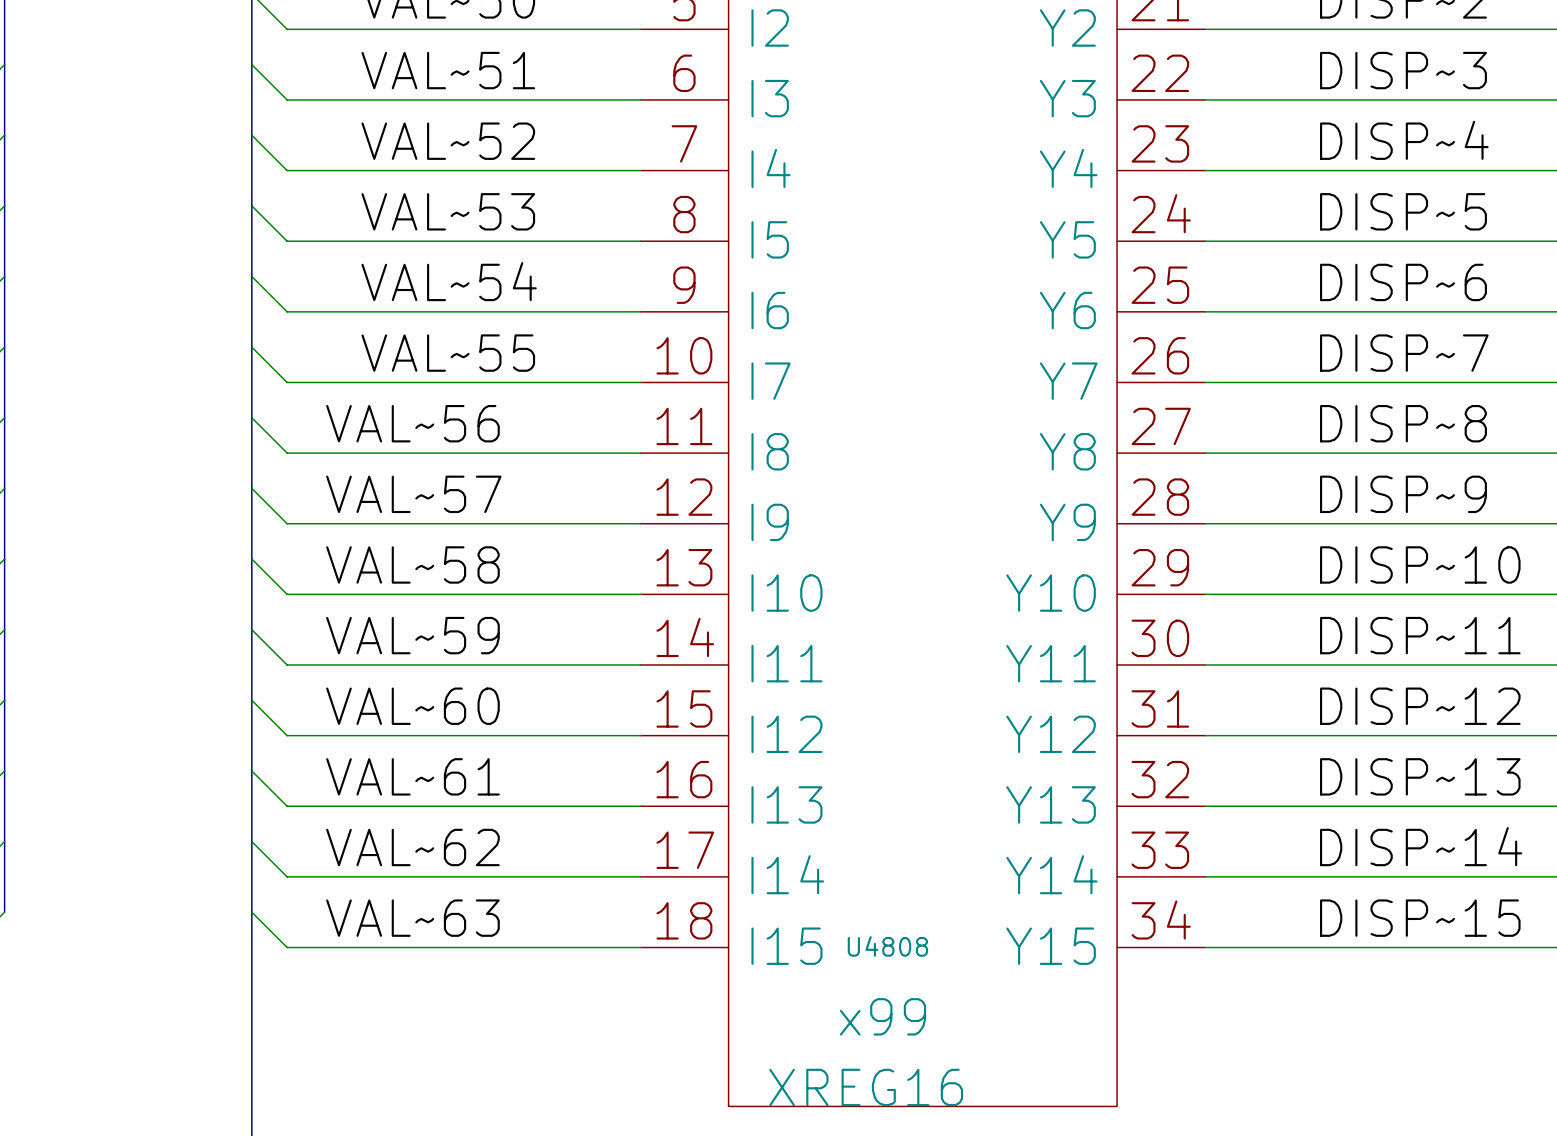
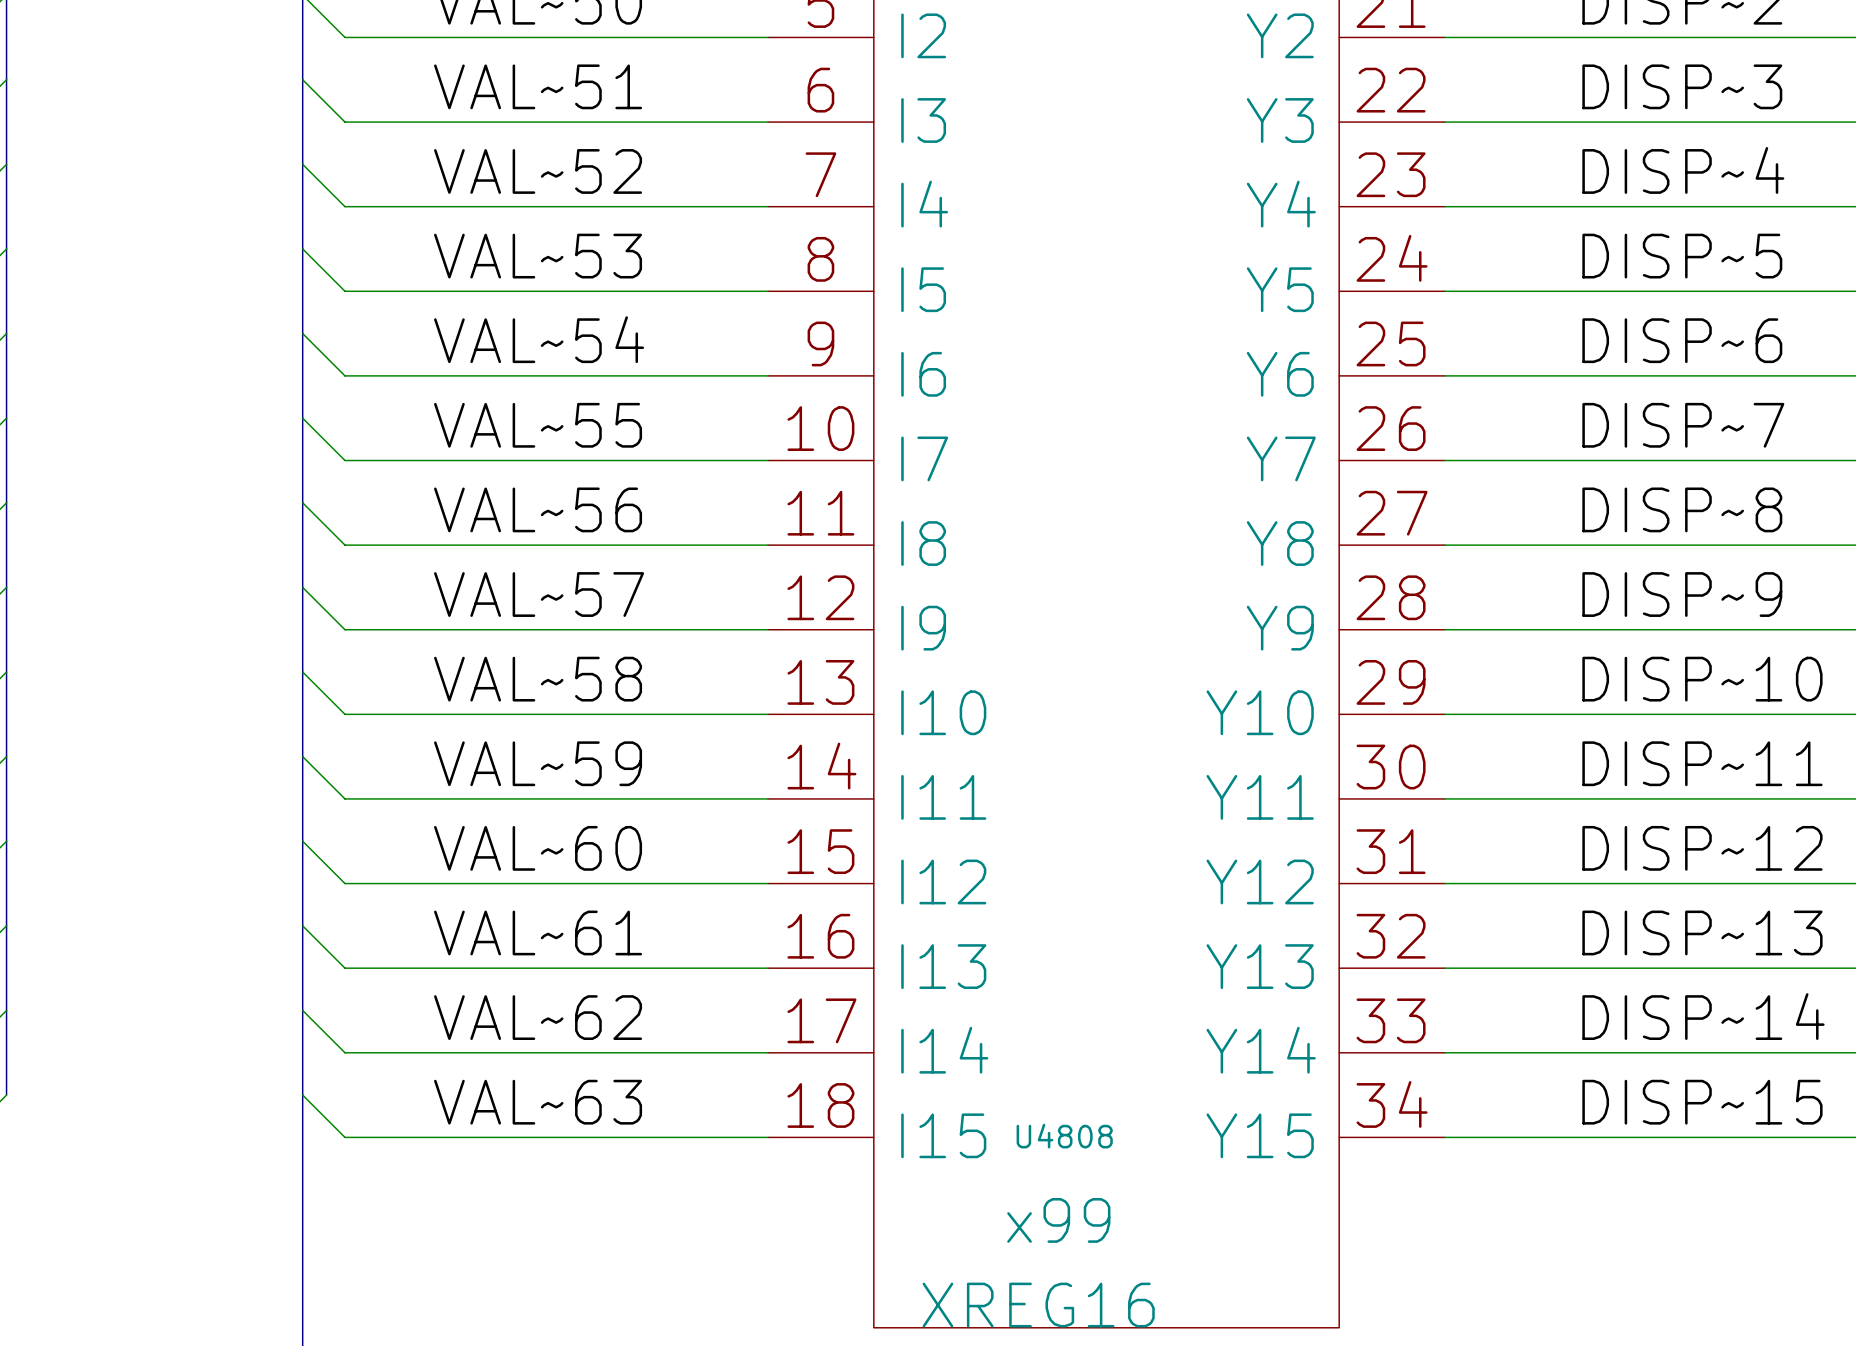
label position: VAL~56 (412, 423) -> VAL~56 (538, 509)
label position: VAL~57 (413, 494) -> VAL~57 (539, 594)
label position: VAL~58 (412, 564) -> VAL~58 (538, 679)
label position: VAL~59 (412, 635) -> VAL~59 (538, 763)
label position: VAL~60 (412, 706) -> VAL~60 (538, 848)
label position: VAL~61 (412, 776) -> VAL~61 (538, 932)
label position: VAL~62 (412, 847) -> VAL~62 (538, 1017)
label position: VAL~63 (412, 918) -> VAL~63 (538, 1102)

